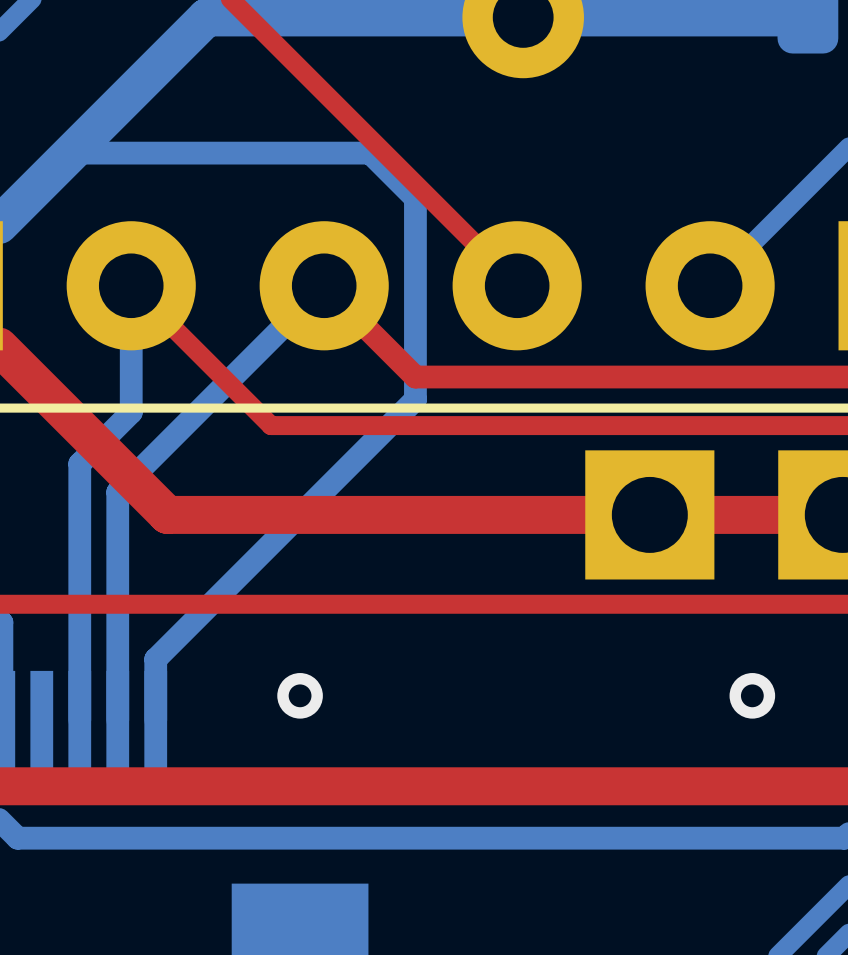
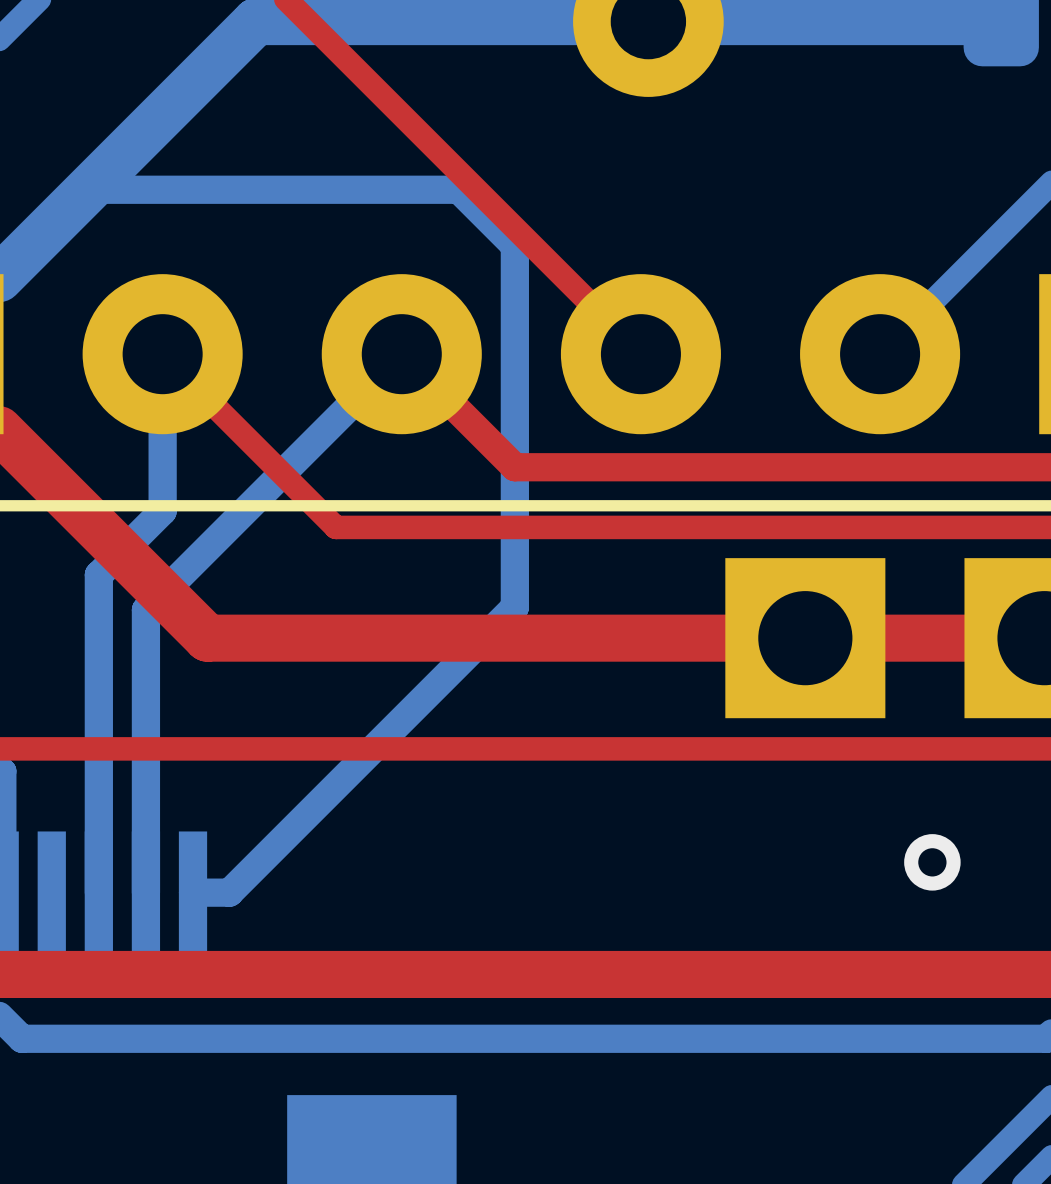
bottom track: (415, 399) (155, 659) (155, 720) -> (514, 495) (514, 607) (229, 892) (193, 892)
via: (300, 695) -> none

